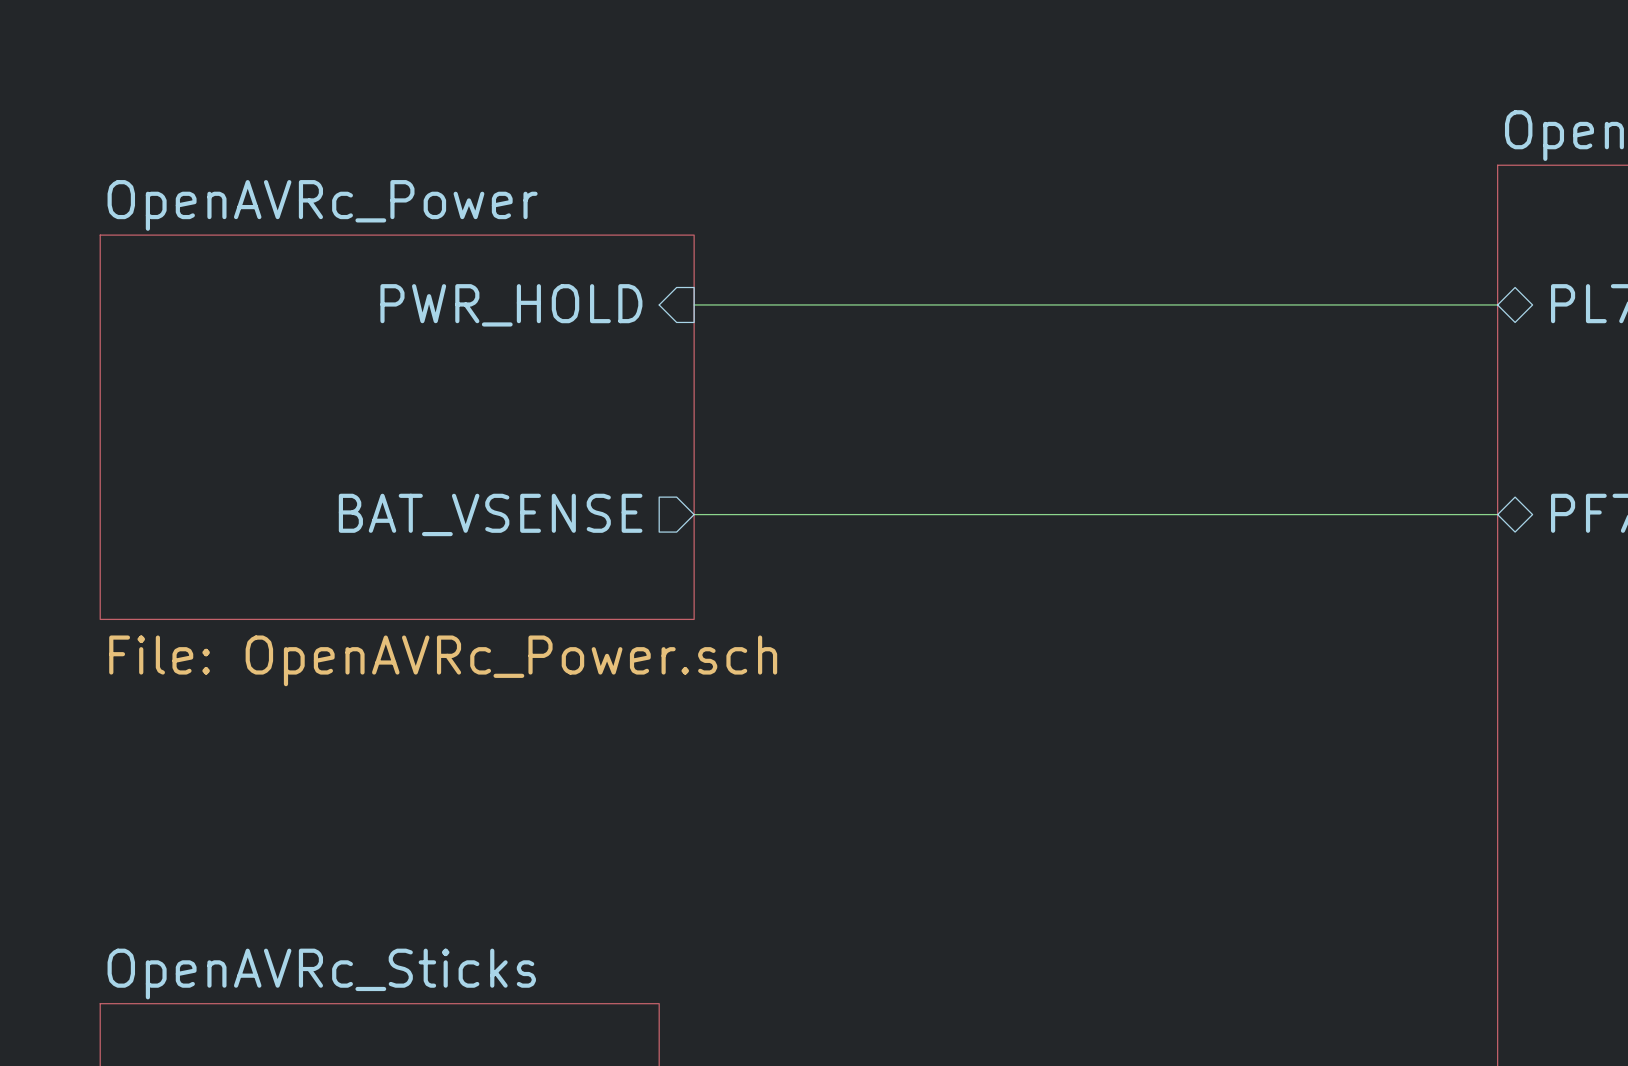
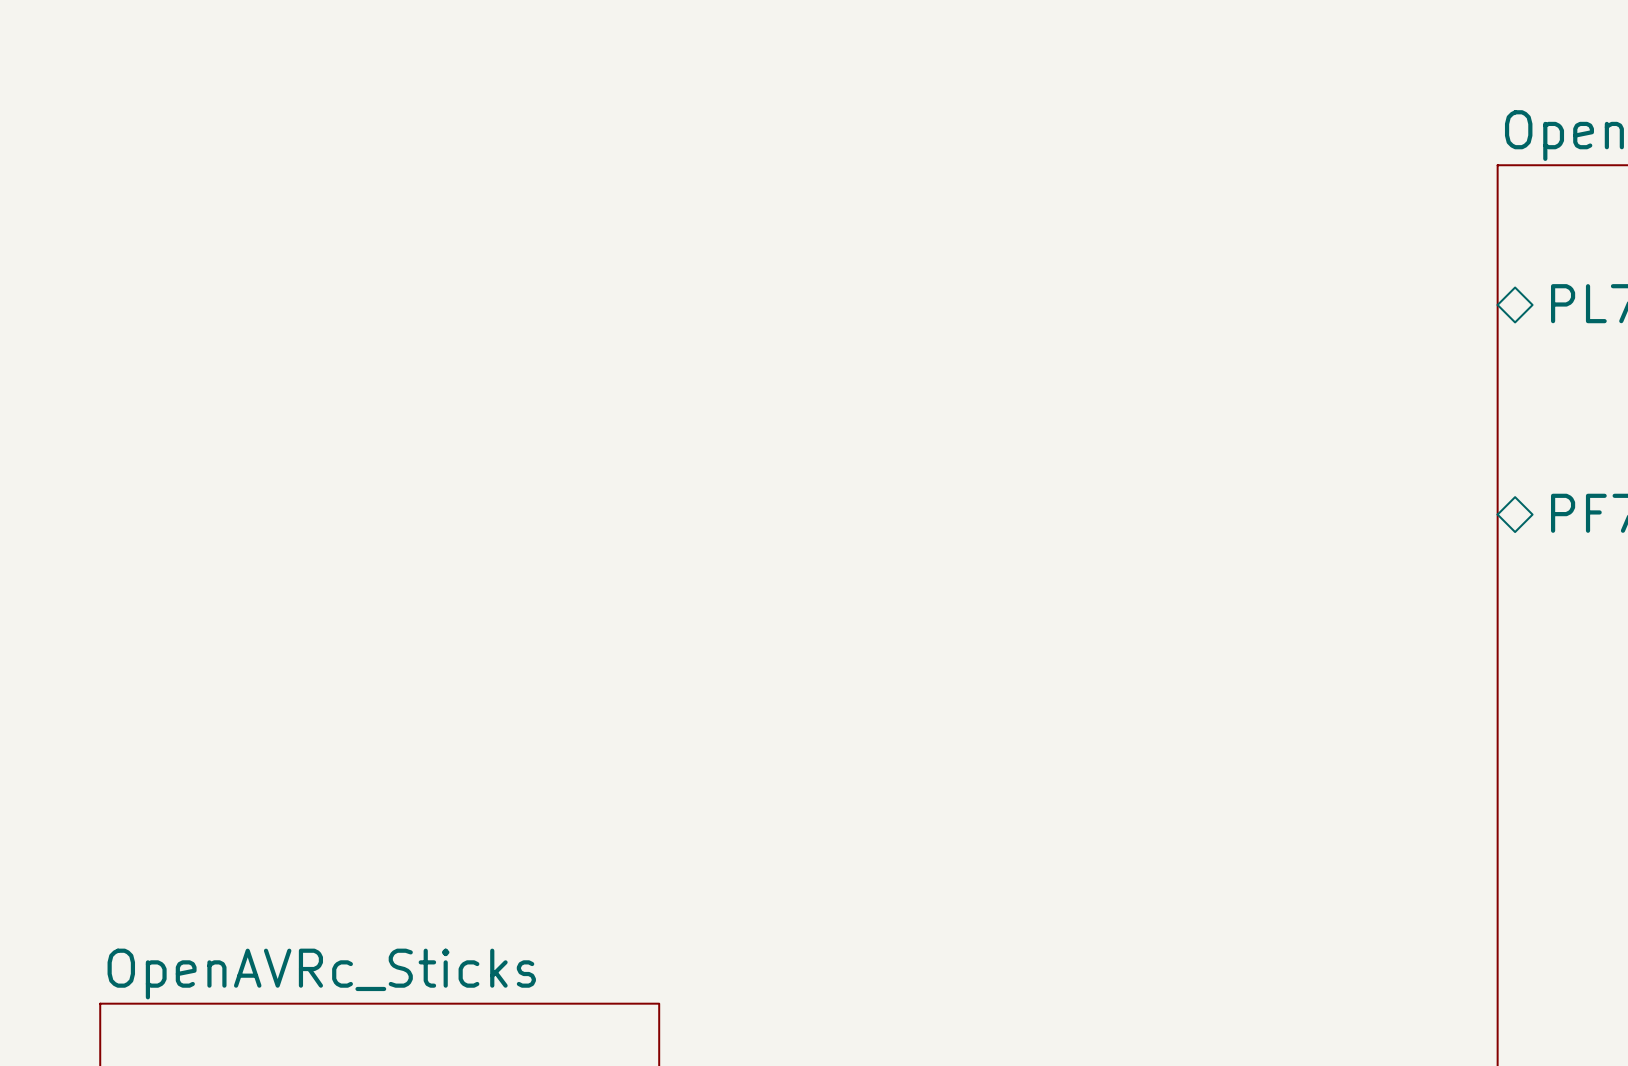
wire: (694, 304) (1497, 304) -> none
sheet pin: PWR_HOLD (511, 305) -> none
sheet OpenAVRc_Power: File: OpenAVRc_Power.sch (397, 427) -> none
sheet pin: BAT_VSENSE (490, 514) -> none
wire: (694, 514) (1497, 514) -> none

